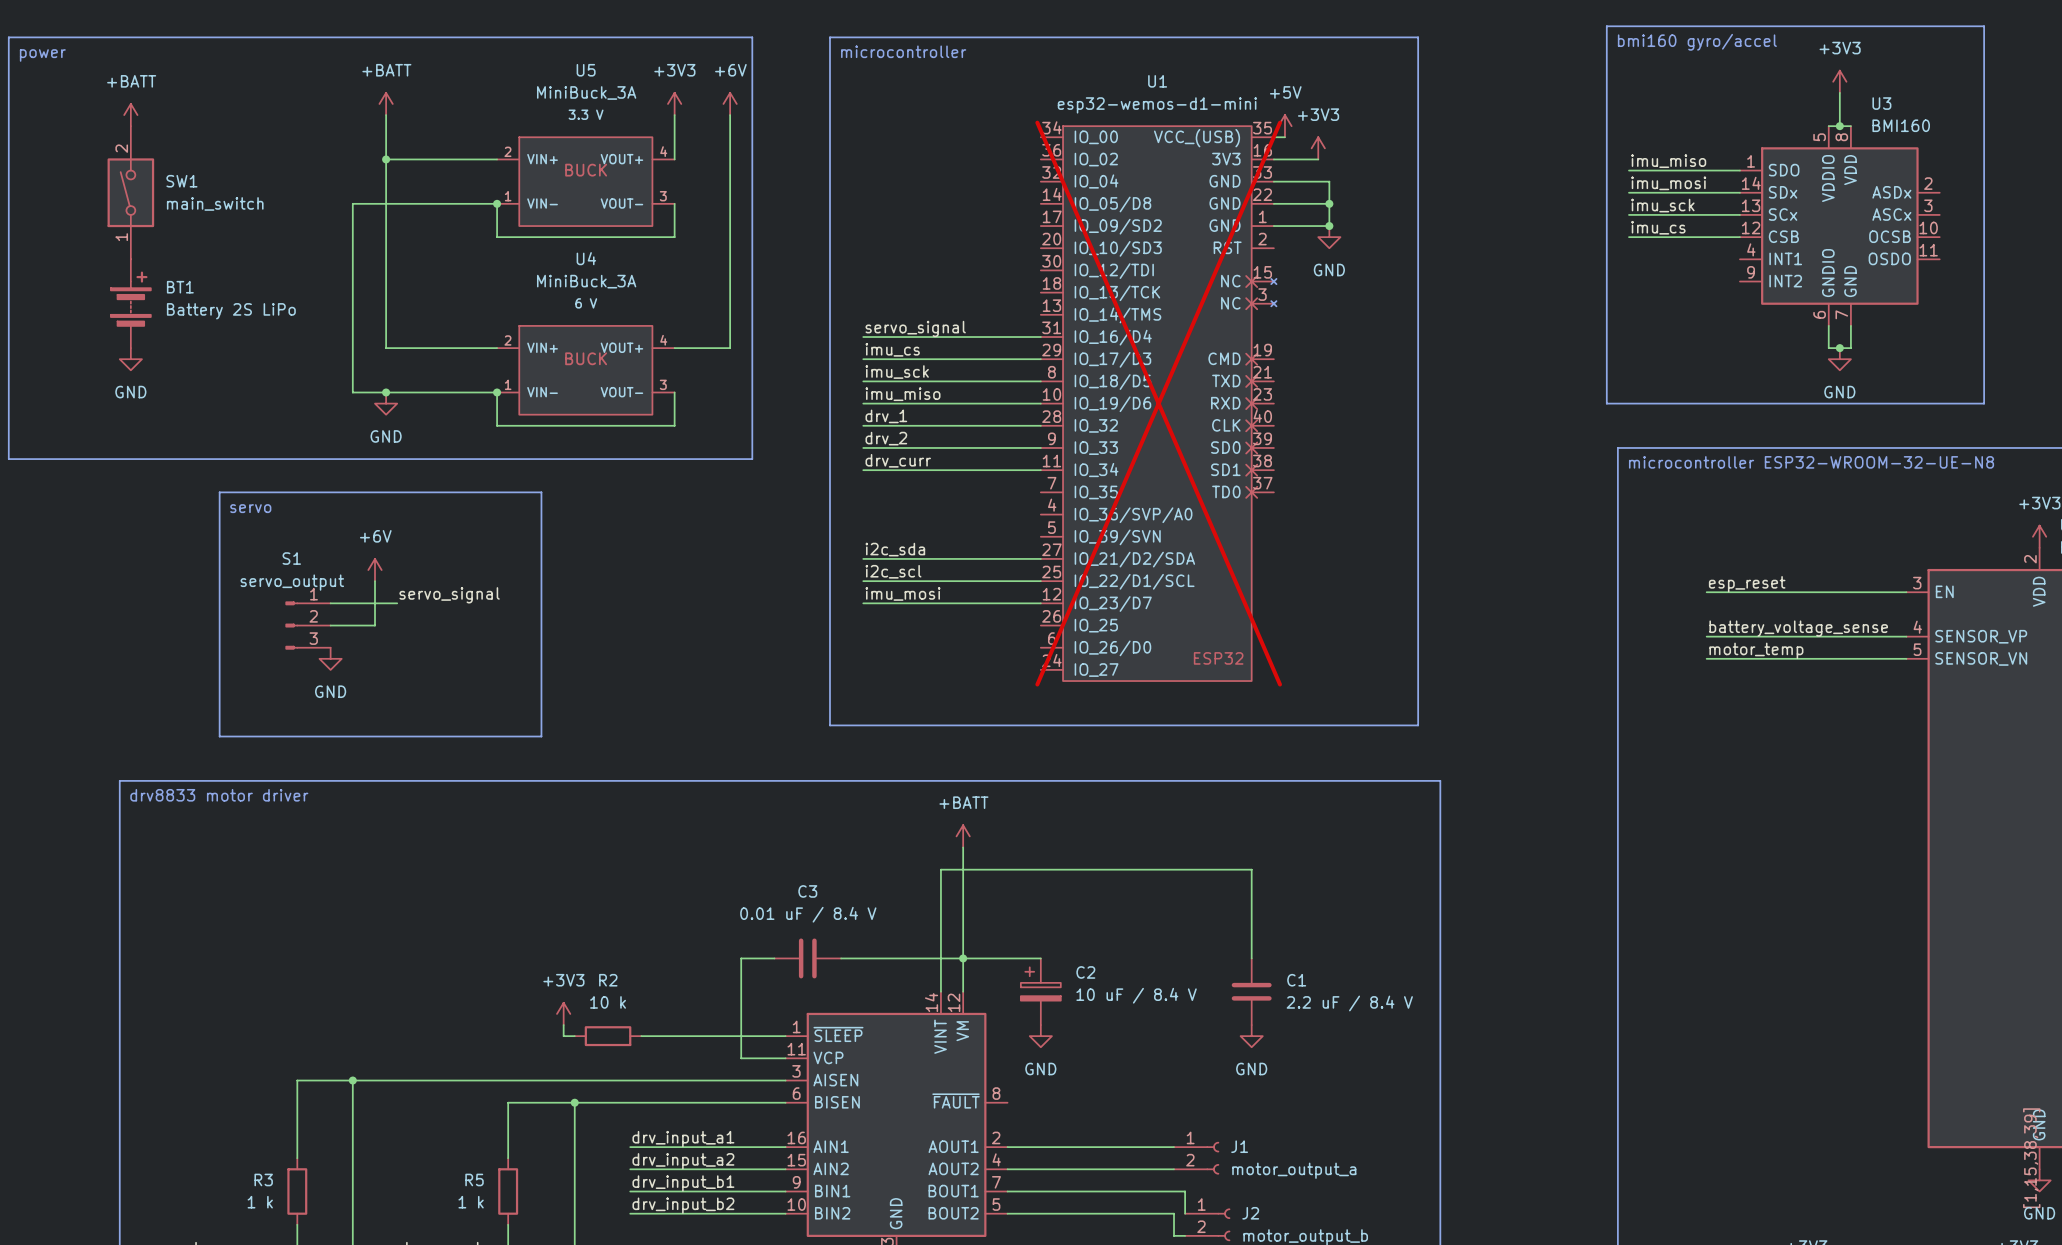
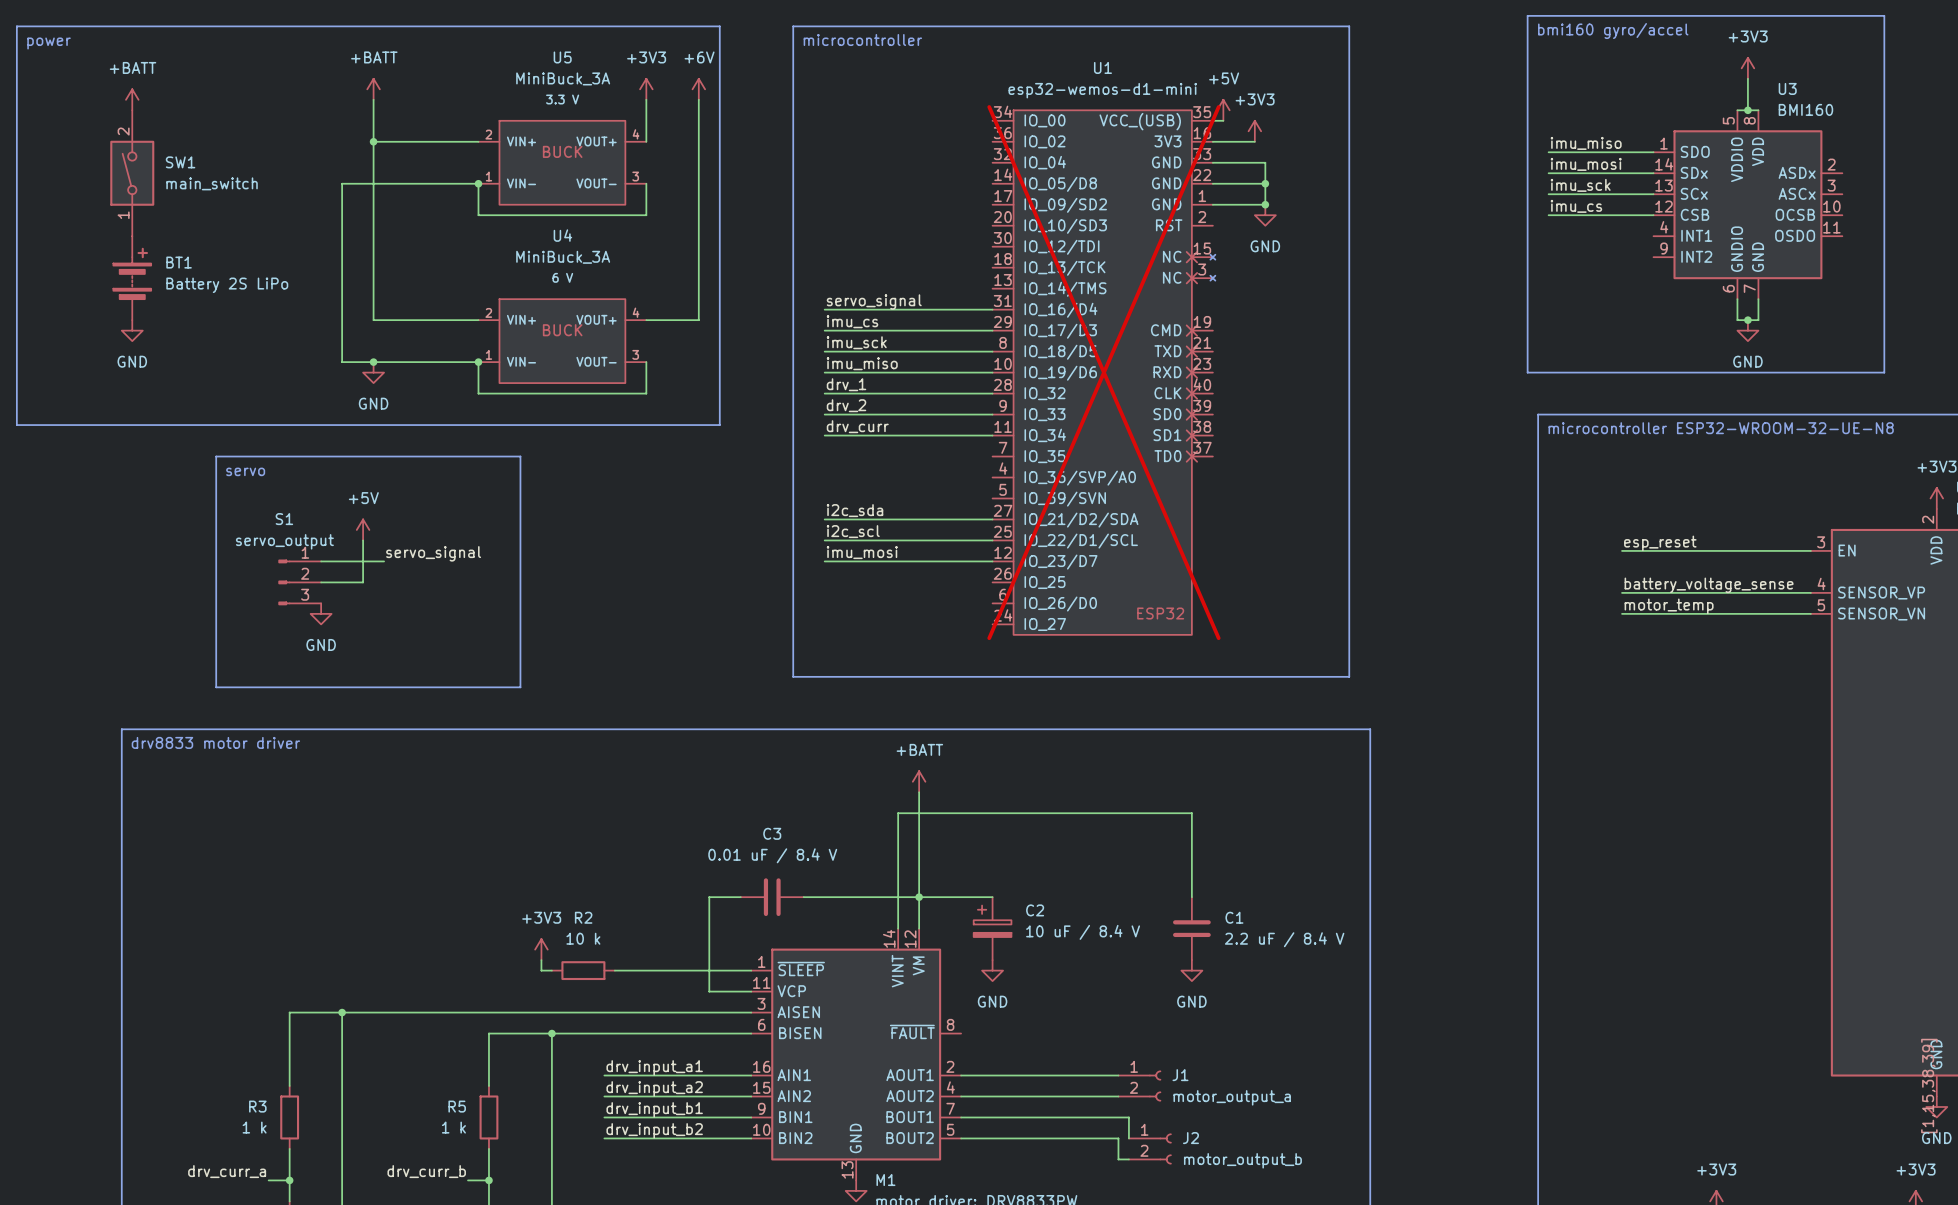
power symbol: +6V (375, 570) -> +5V (363, 529)

